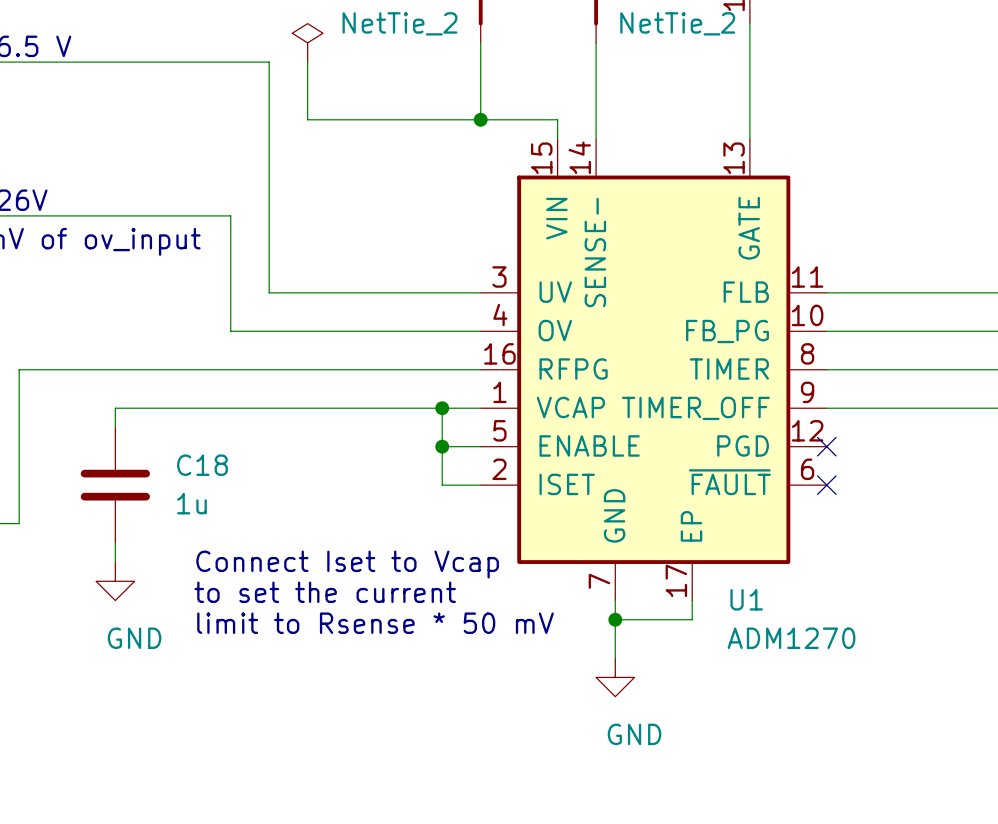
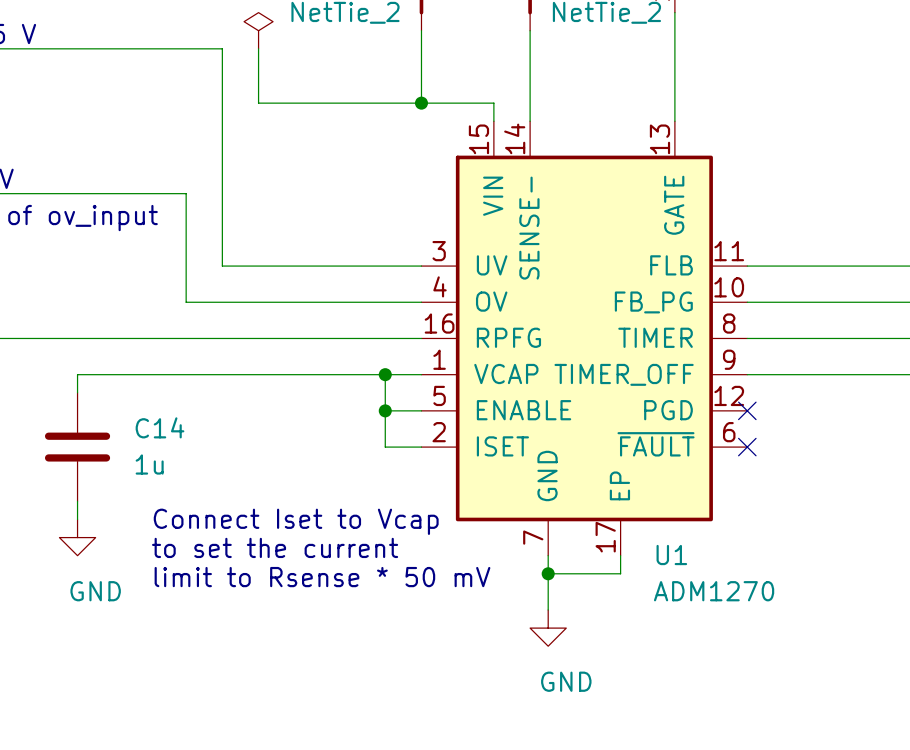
U1 pin name: RFPG (573, 369) -> RPFG (508, 337)
C18 name: C18 (202, 465) -> C14 (160, 427)

